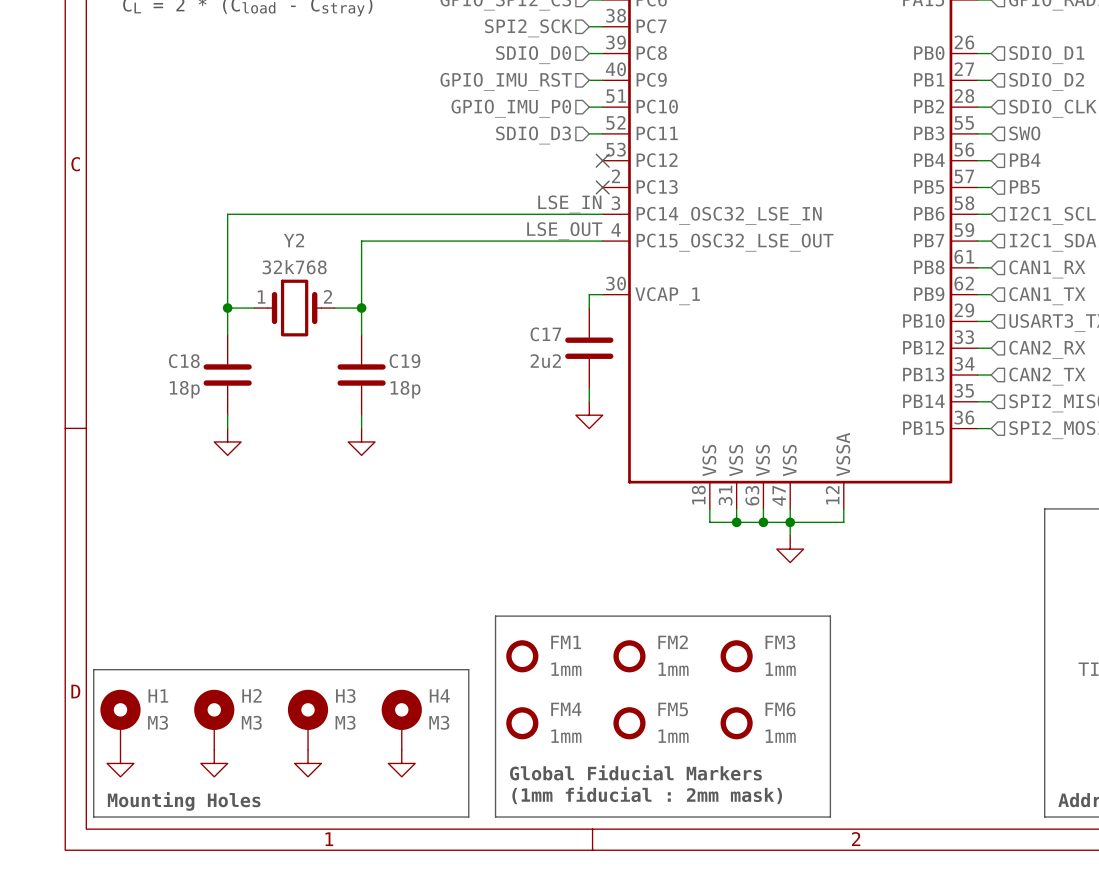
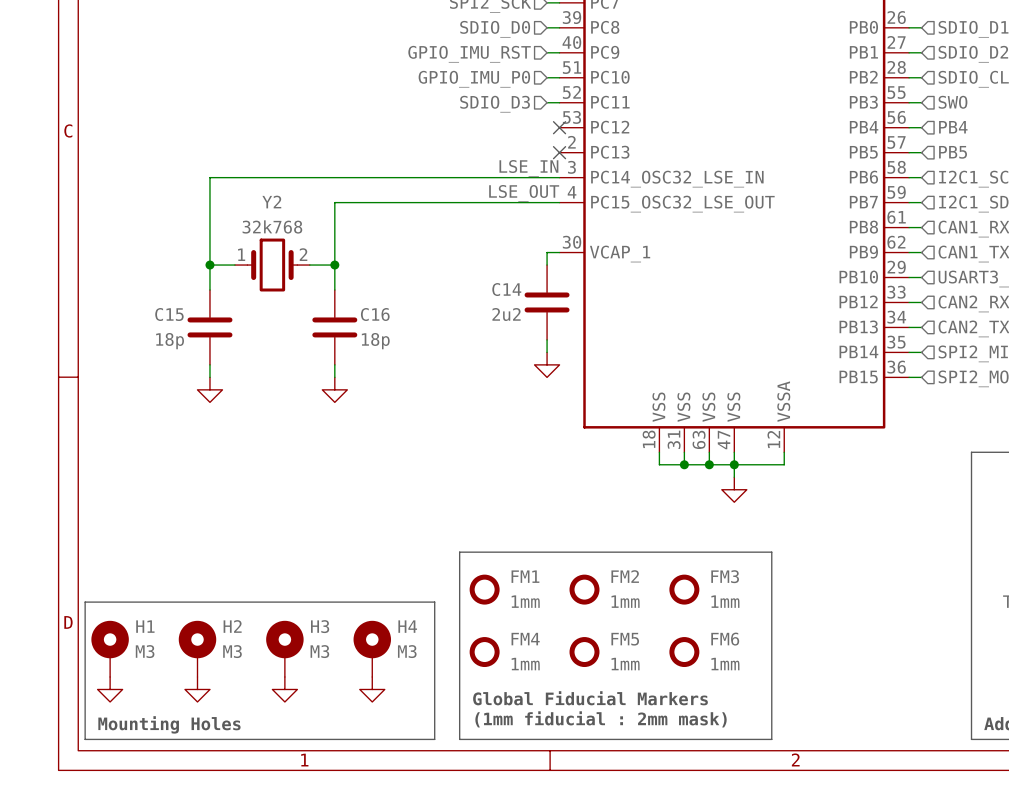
C17 name: C17 (545, 334) -> C14 (506, 289)
C18 name: C18 (184, 361) -> C15 (169, 314)
C19 name: C19 (404, 361) -> C16 (375, 314)

